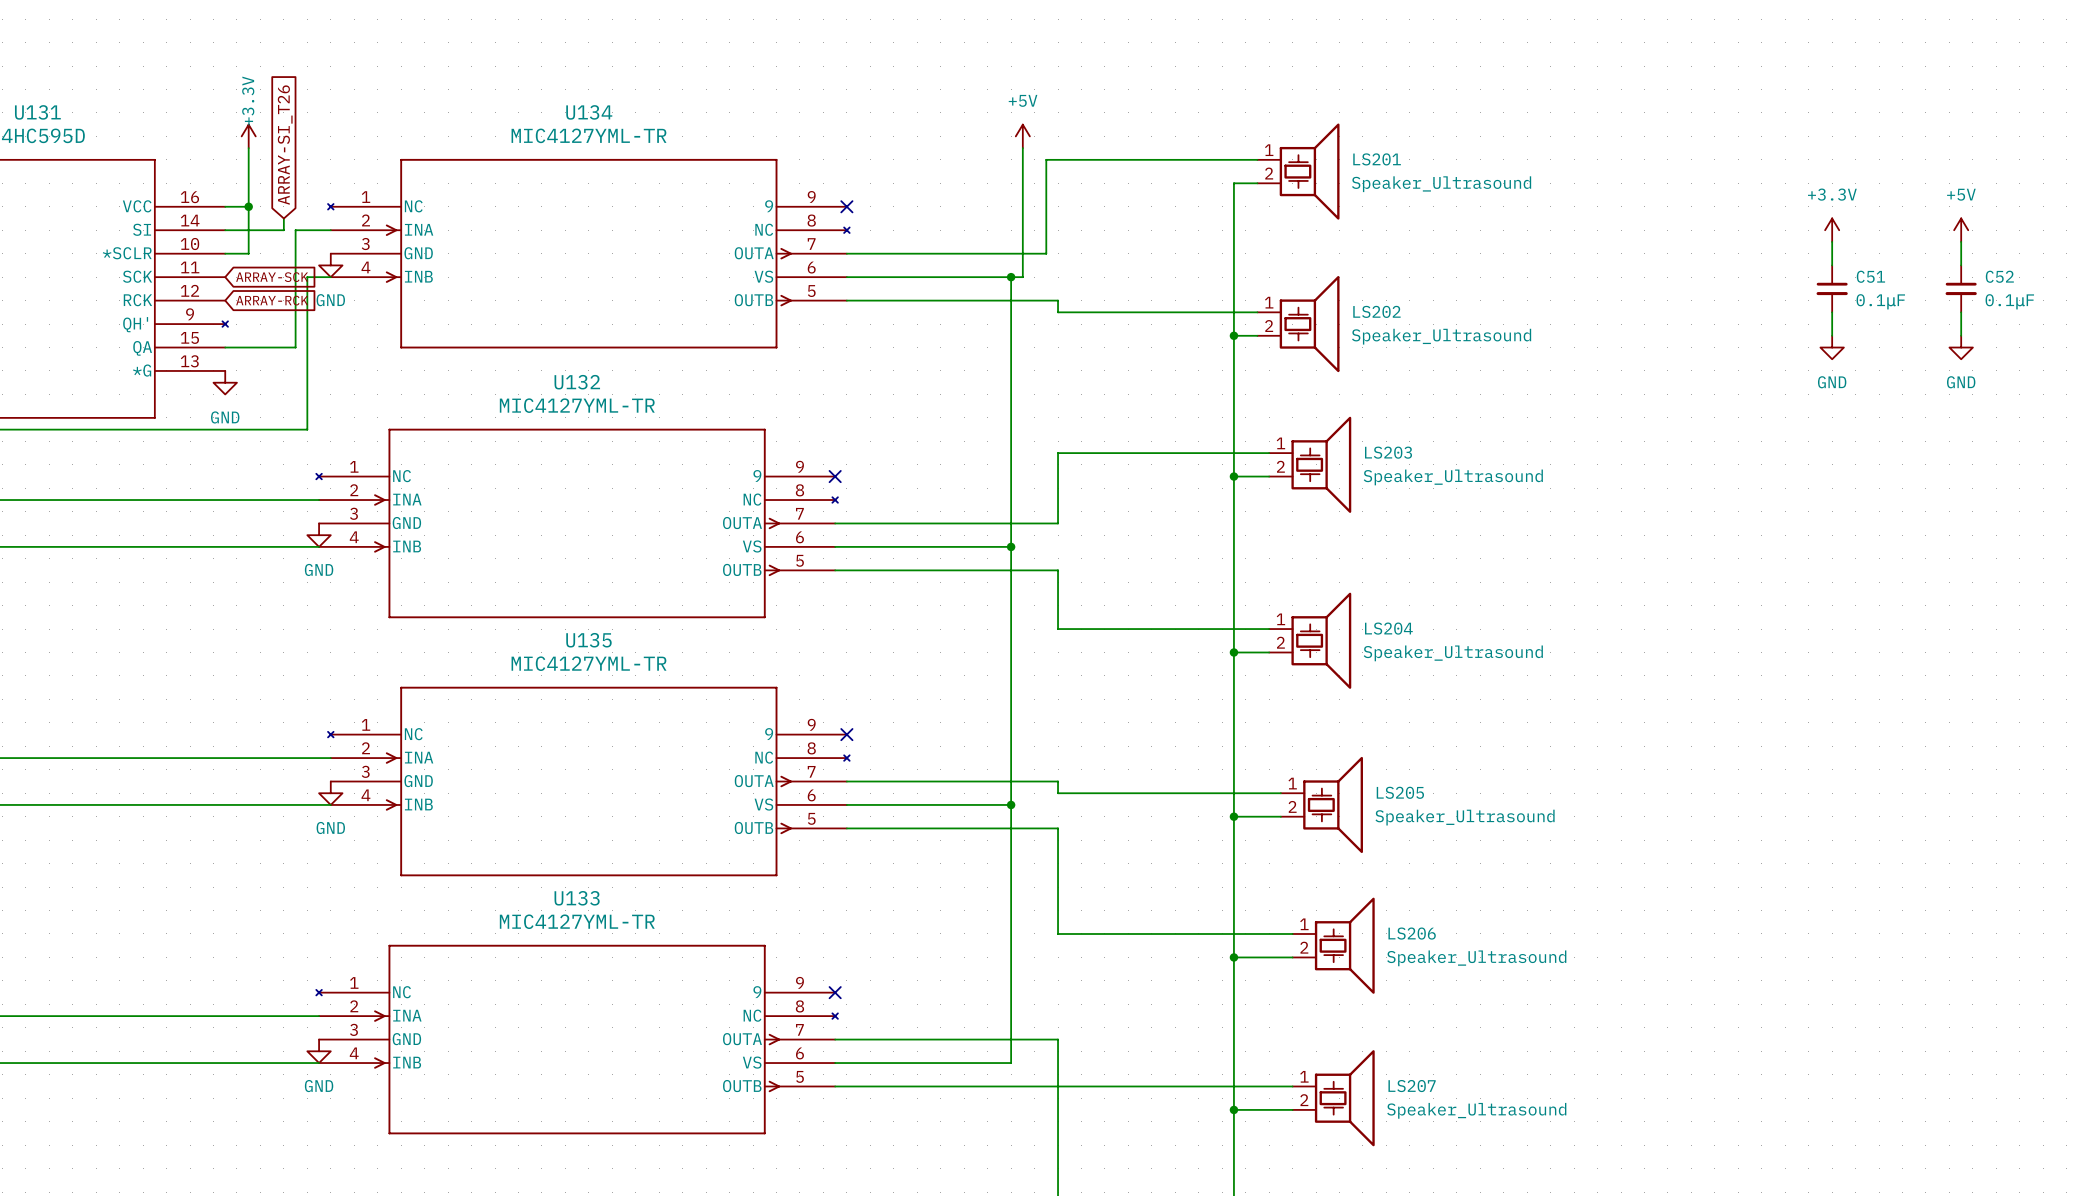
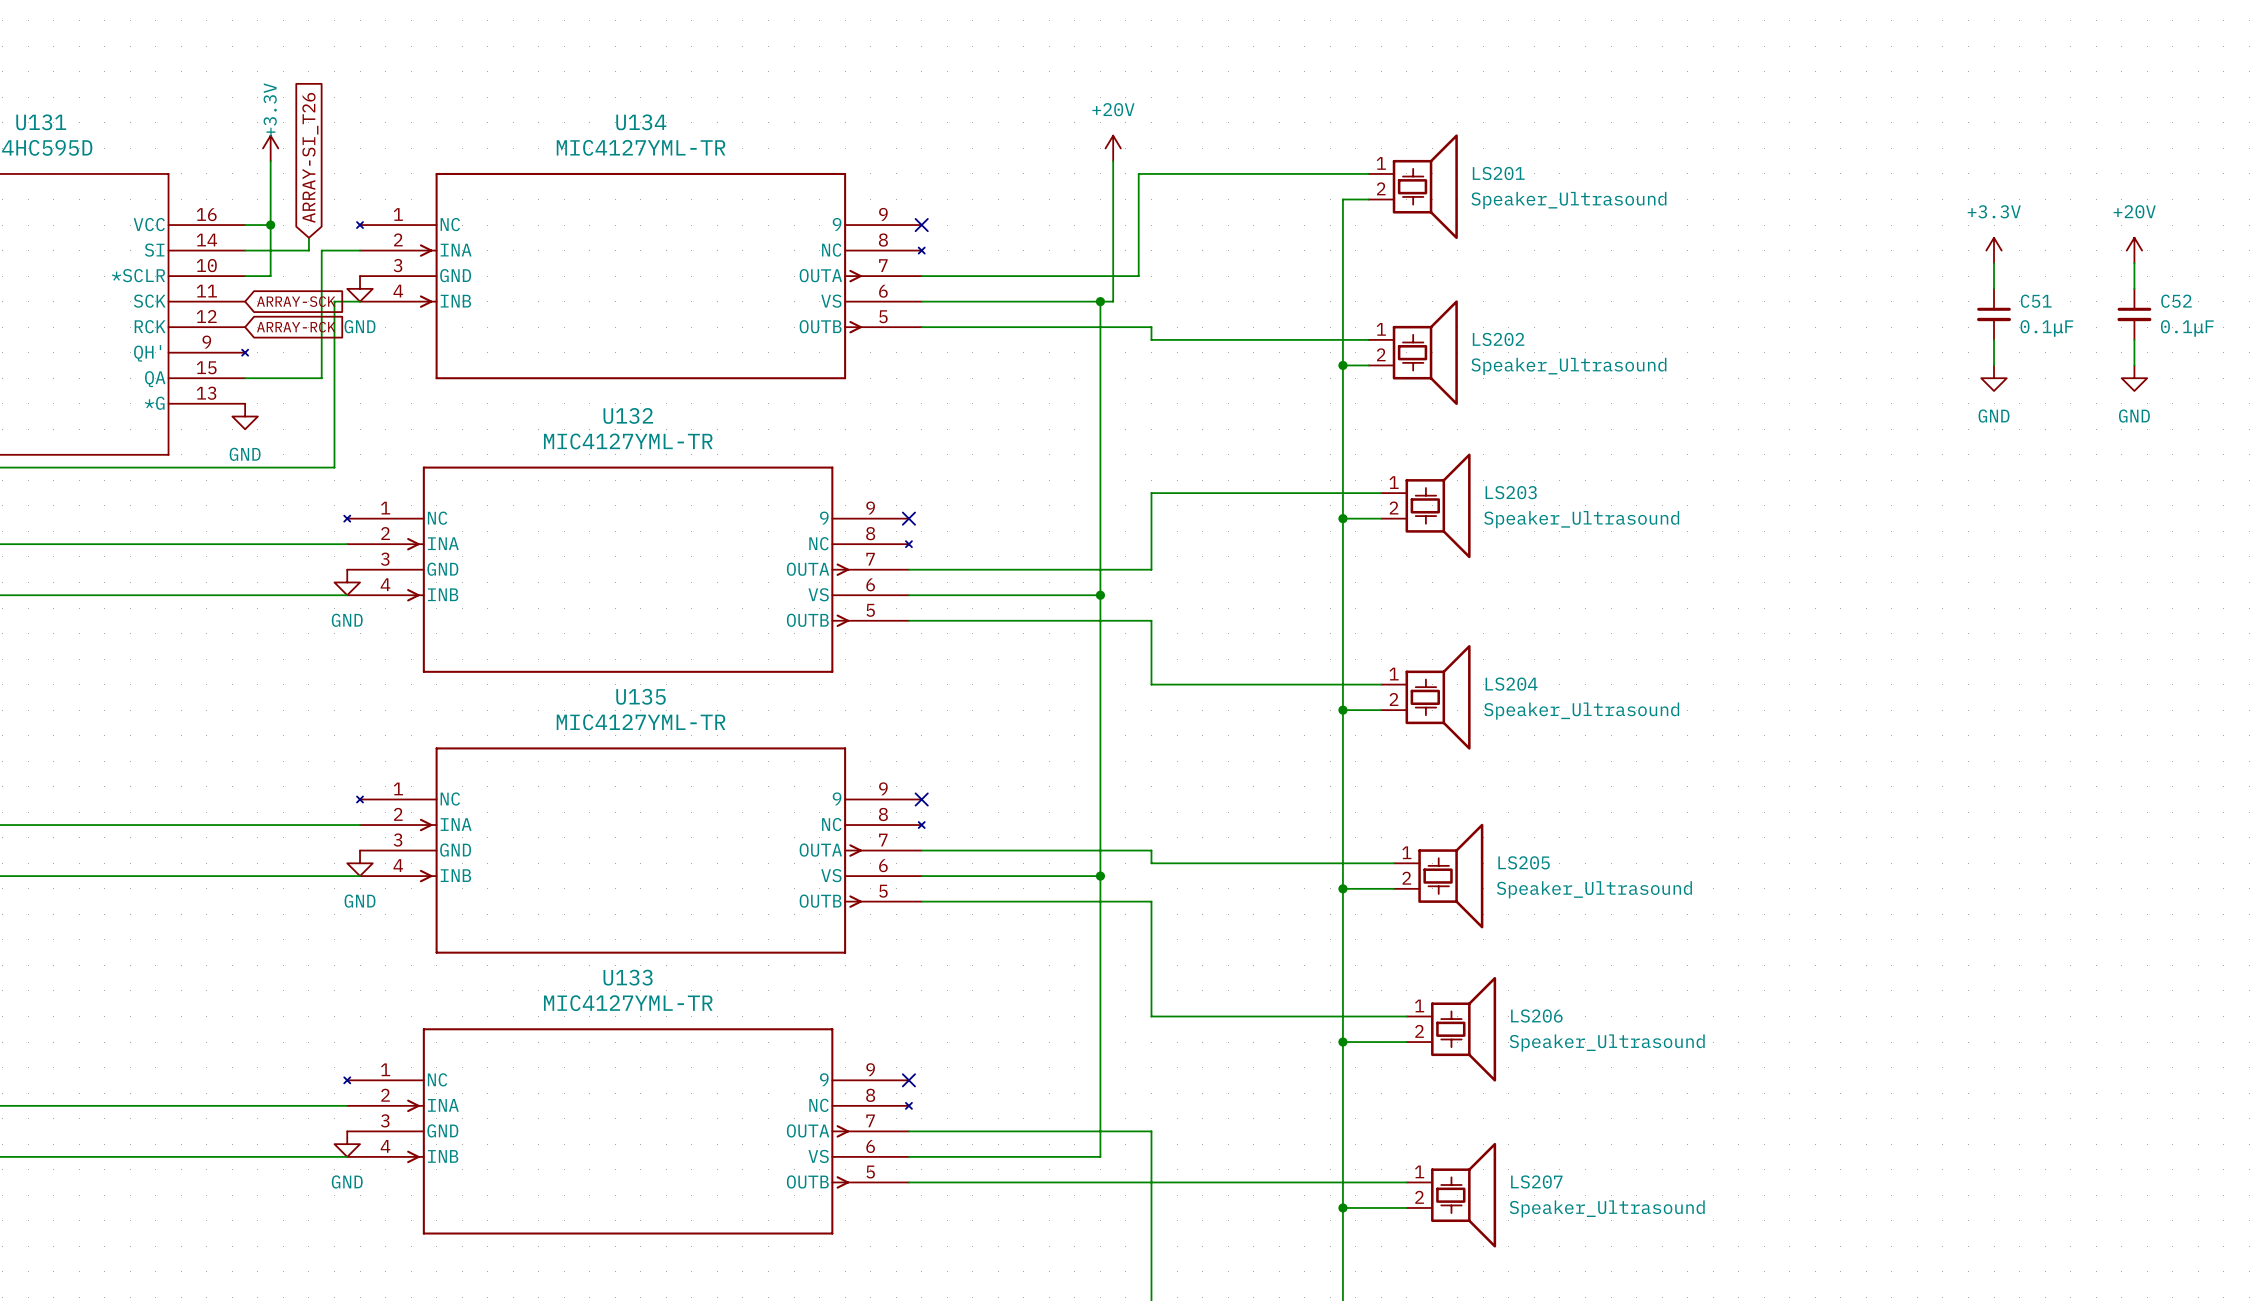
power symbol: +5V (1022, 136) -> +20V (1113, 148)
power symbol: +5V (1961, 230) -> +20V (2134, 250)

